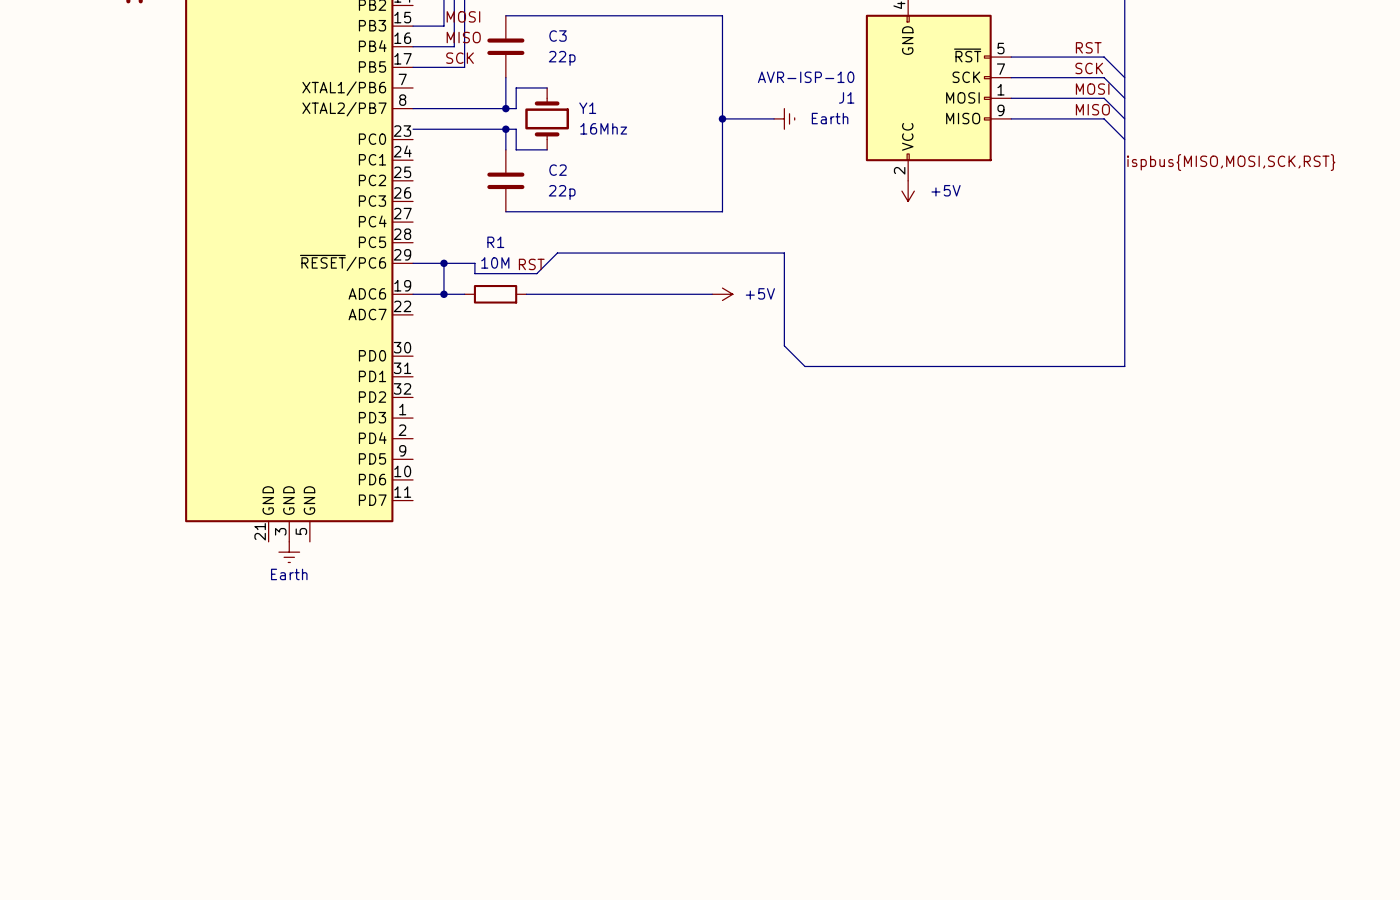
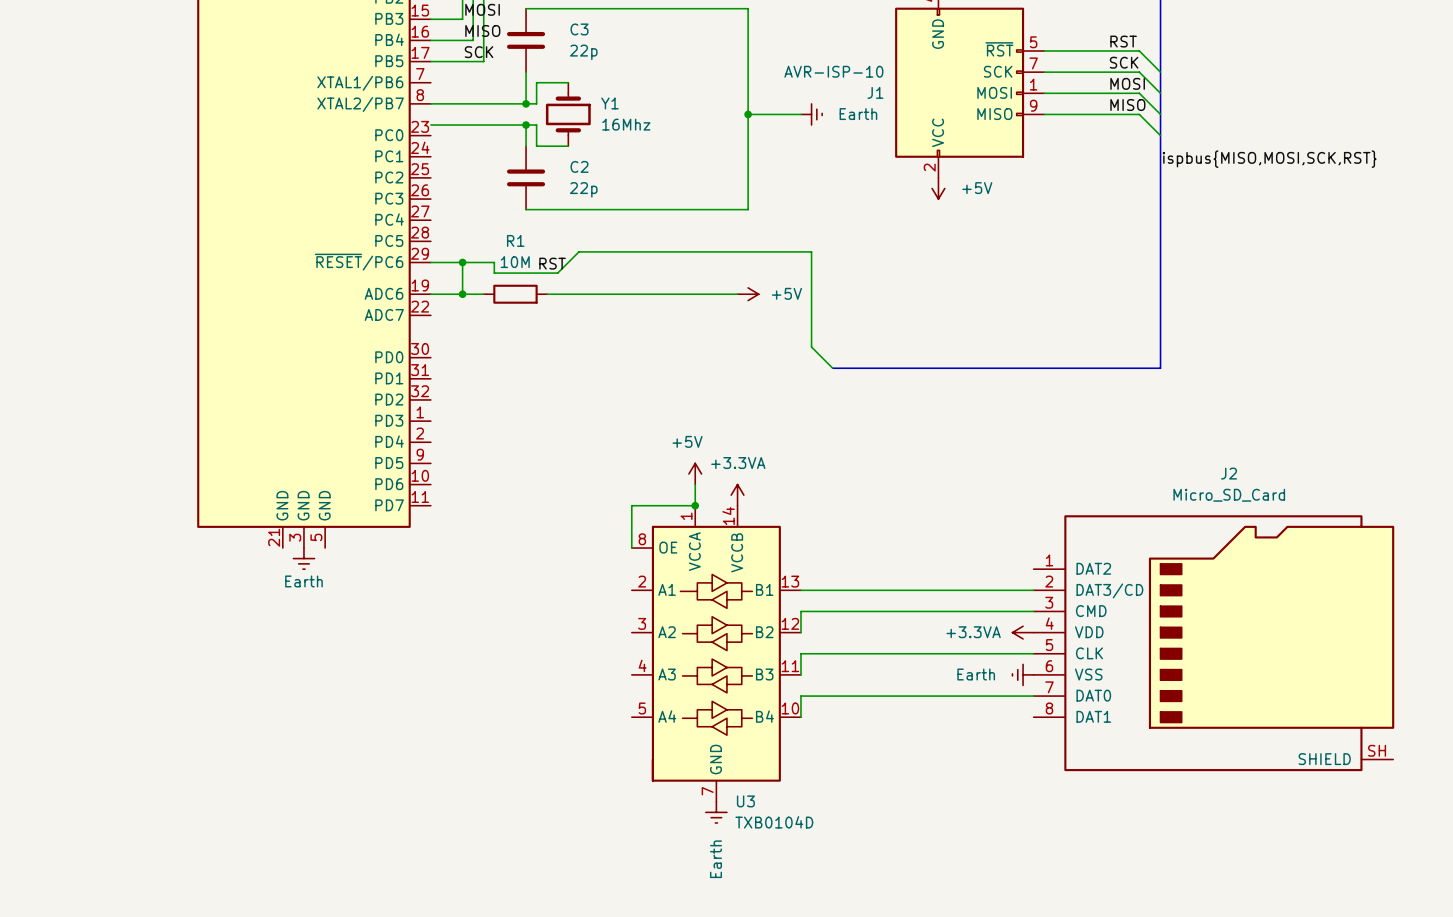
power symbol: none -> +5V (695, 473)
wire: none -> (695, 484) (695, 505) (631, 505) (631, 548)
power symbol: none -> +3.3VA (737, 495)
junction: none -> (695, 505)
wire: none -> (800, 590) (1033, 590)
wire: none -> (1033, 611) (800, 611) (800, 632)
power symbol: none -> +3.3VA (1023, 632)
J2: none -> Micro_SD_Card (1213, 643)
U3: none -> TXB0104D (716, 653)
wire: none -> (1033, 653) (800, 653) (800, 674)
power symbol: none -> Earth (1023, 674)
wire: none -> (1033, 696) (800, 696) (800, 717)
power symbol: none -> Earth (716, 812)

